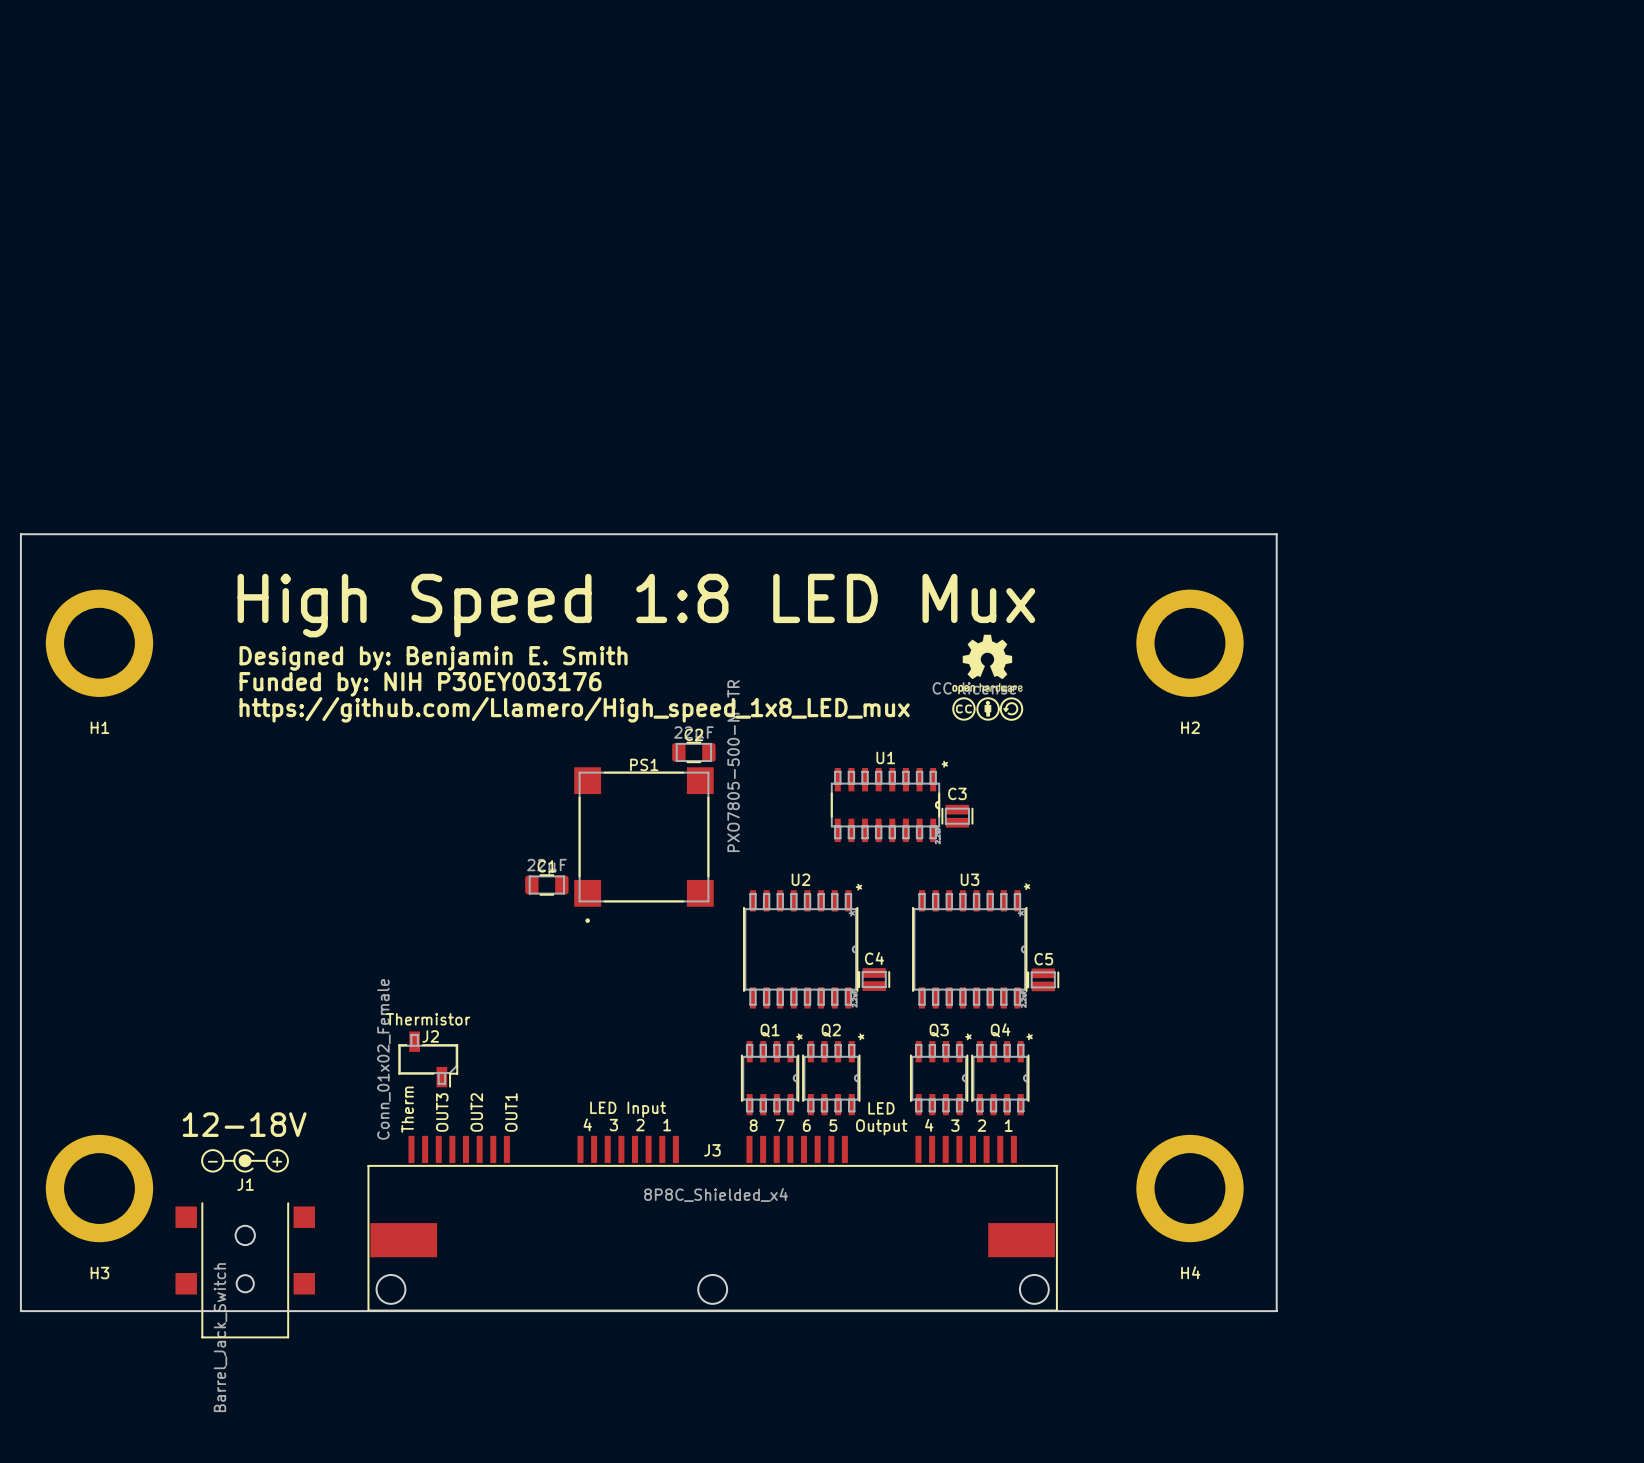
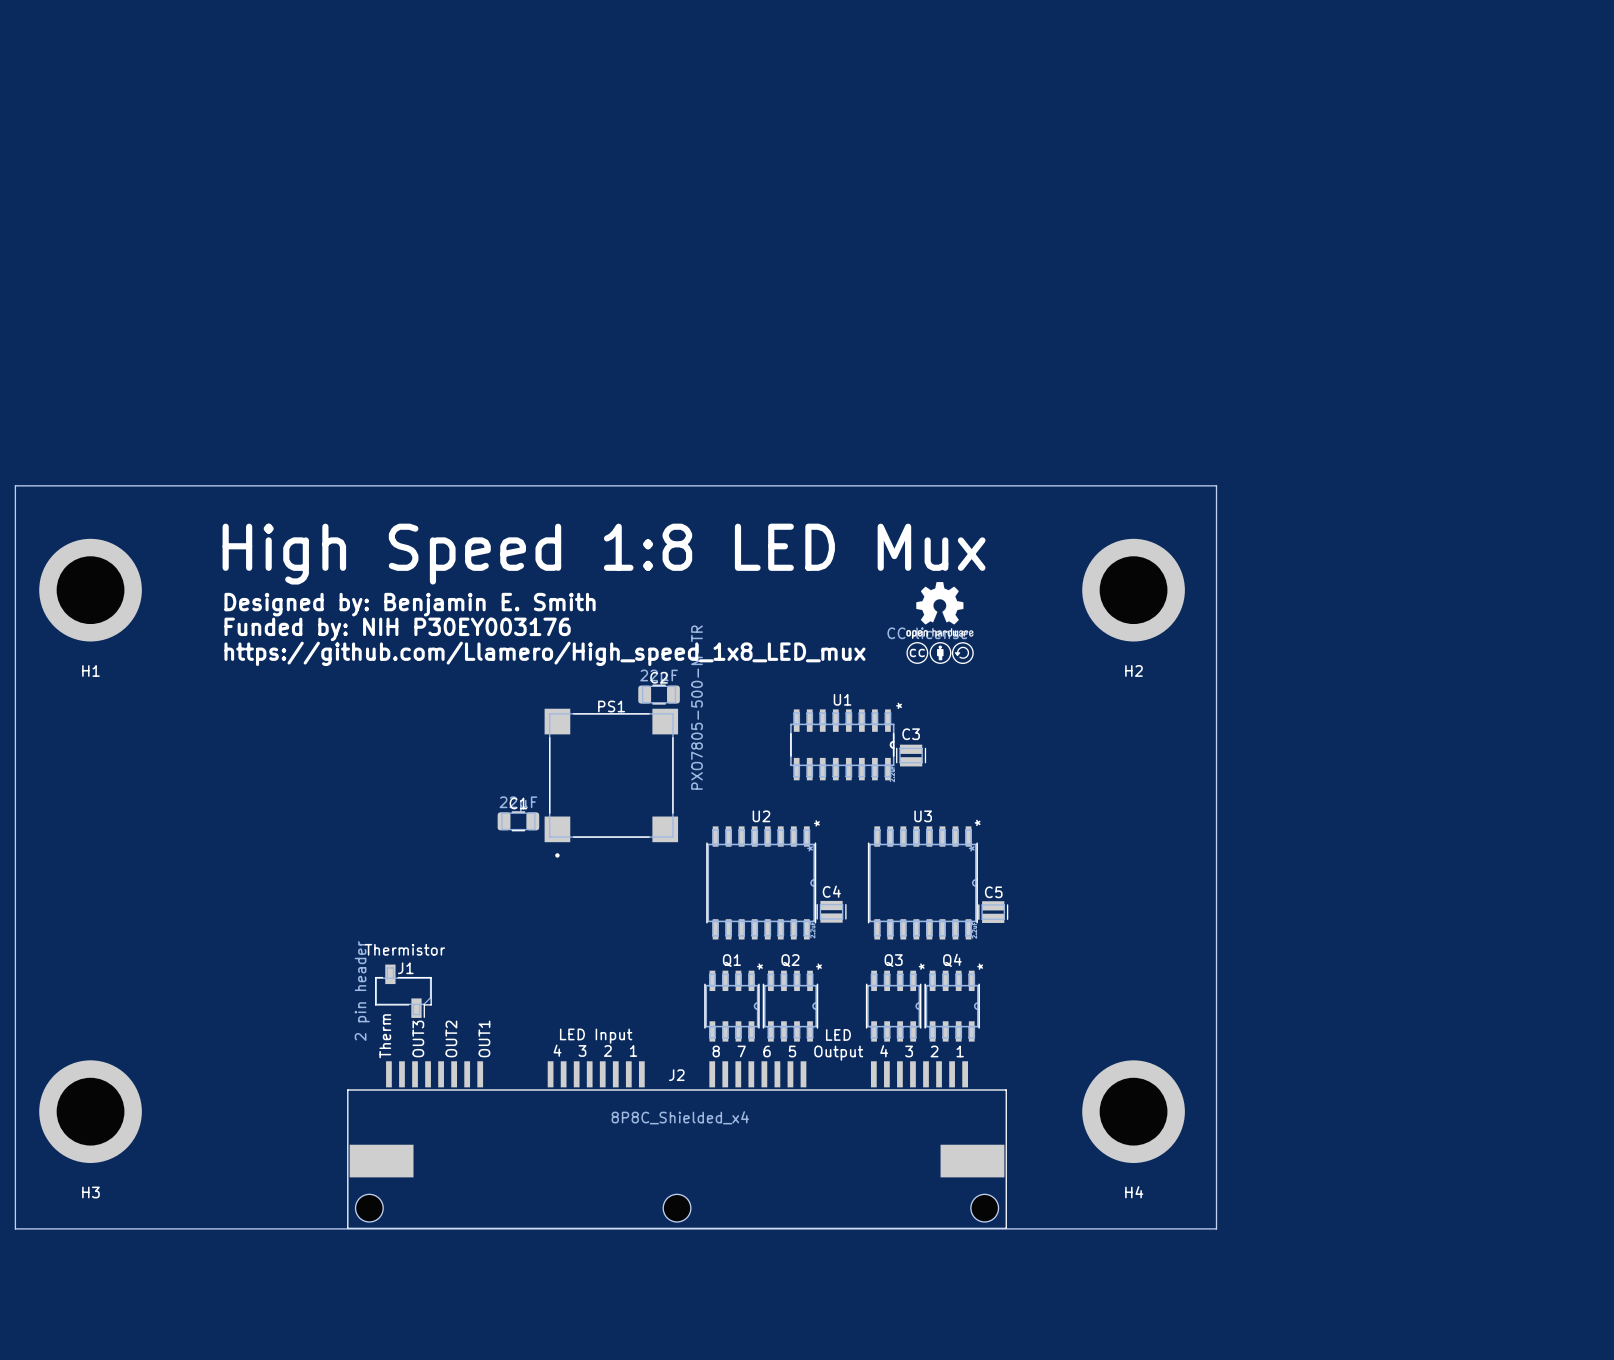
J2: Conn_01x02_Female (428, 1059) -> none
text: 12-18V (244, 1124) -> none
drawing: [201, 1149, 289, 1173] -> none
J3 name: J3 (712, 1150) -> J2 (676, 1075)
J1 name position: J1 (245, 1184) -> J1 (405, 968)
J1 footprint: [175, 1202, 316, 1339] -> [375, 964, 432, 1018]
J1 value: Barrel_Jack_Switch (220, 1337) -> 2 pin header (362, 991)

